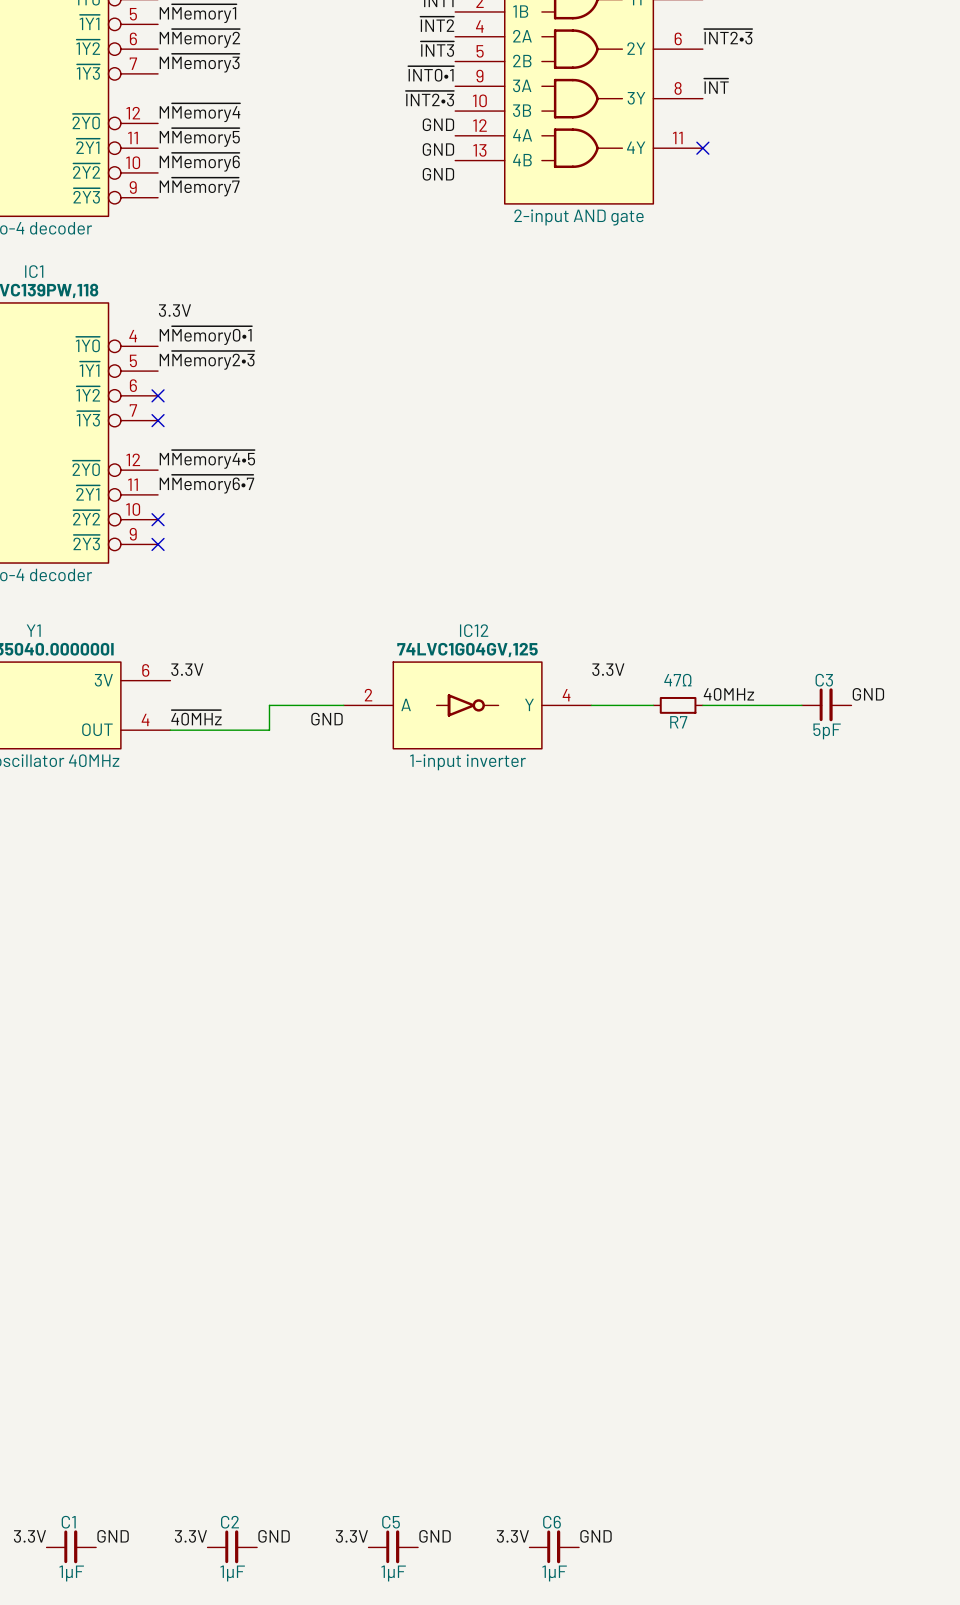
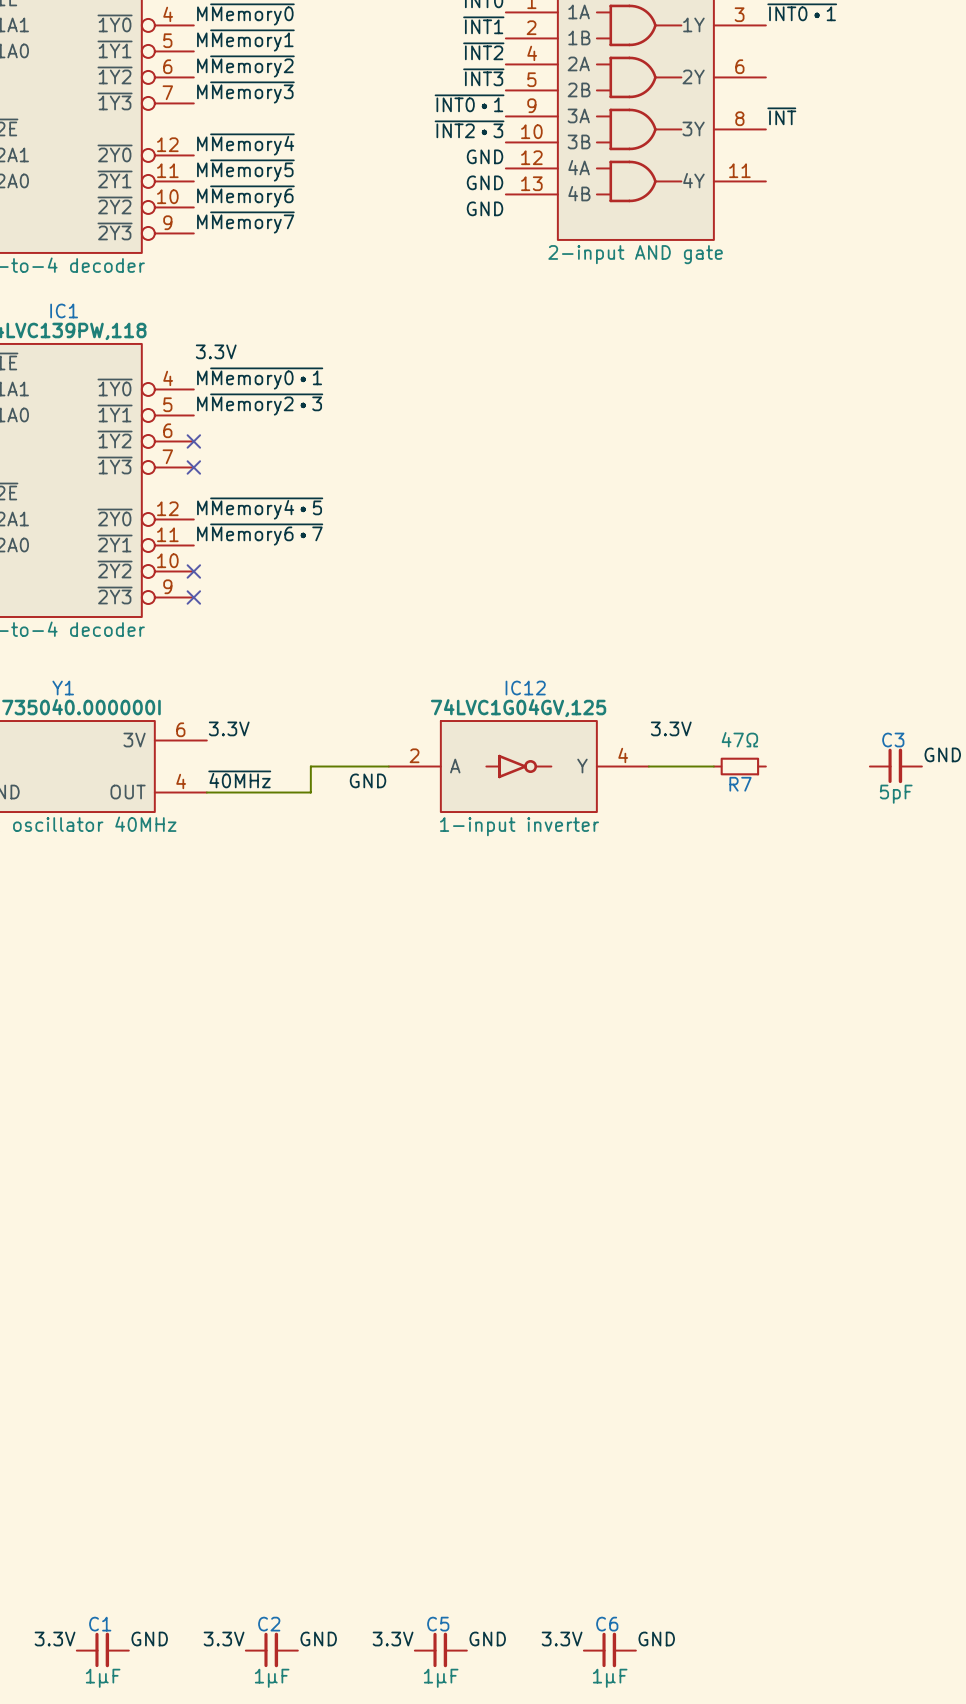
label: ~{INT2•3} (728, 36) -> none
no-connect mark: (702, 148) -> none
label: 40MHz (728, 694) -> none
wire: (702, 705) (801, 705) -> none

